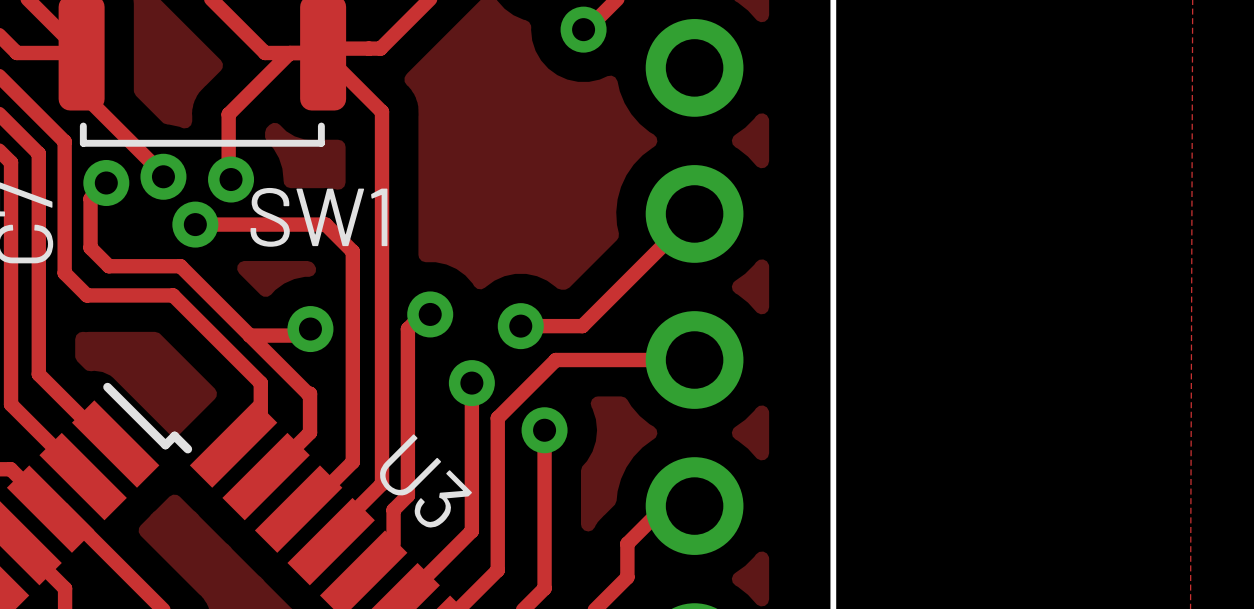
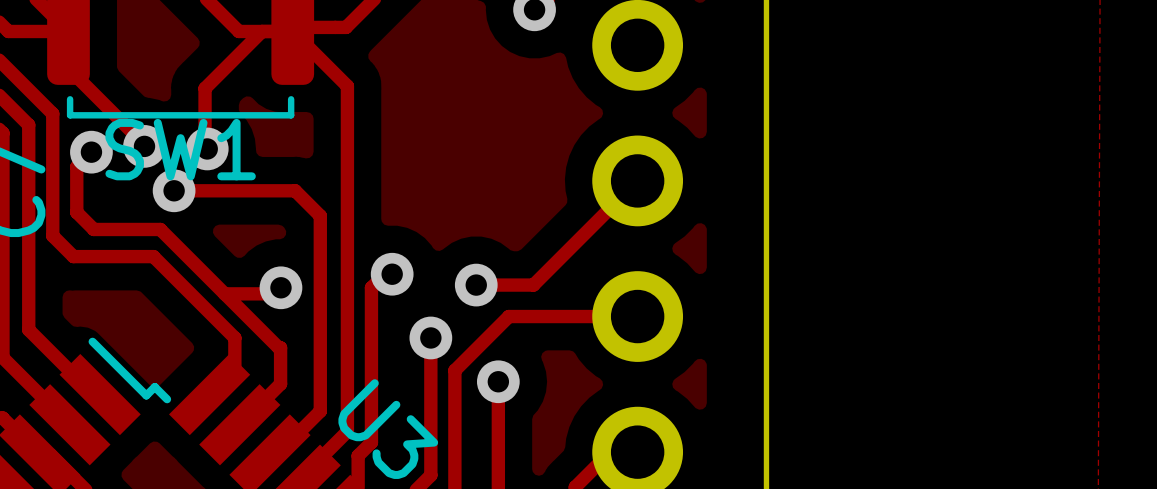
SW1 name position: SW1 (318, 217) -> SW1 (180, 149)

